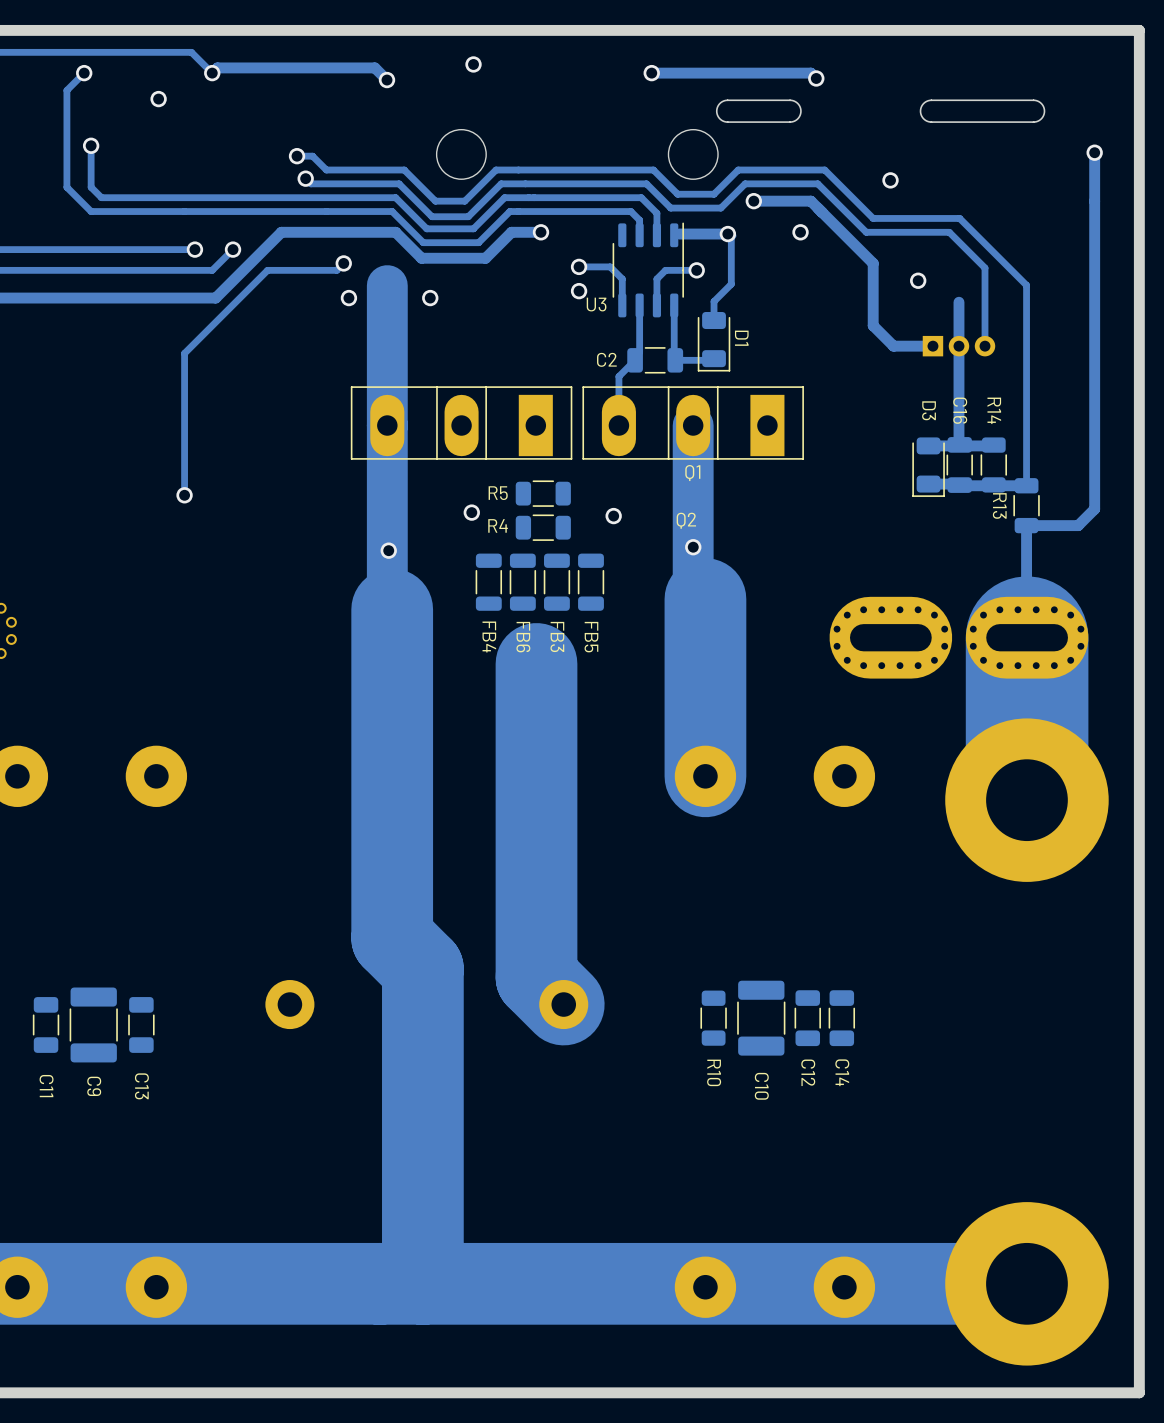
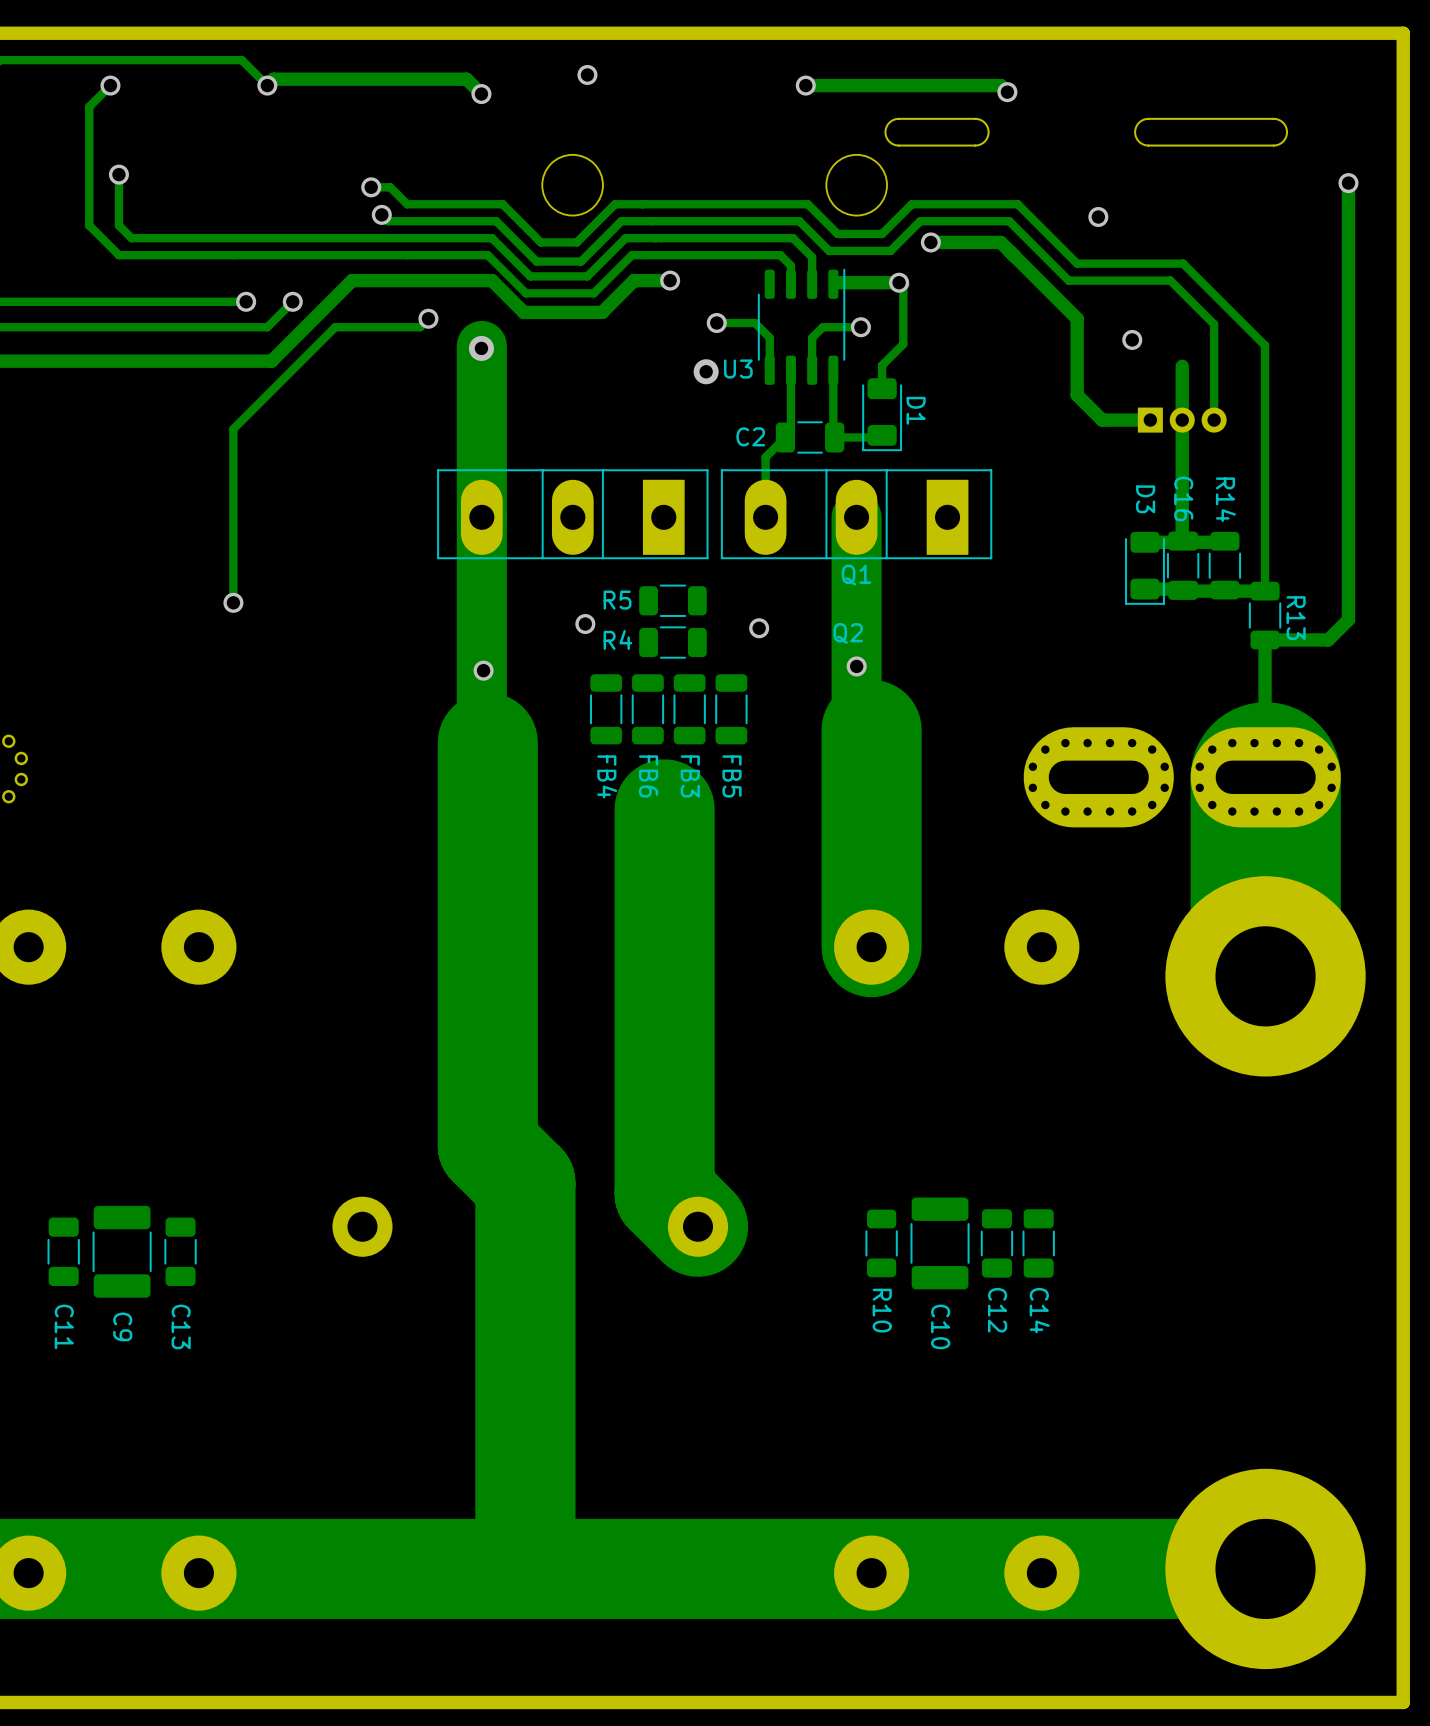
via: (158, 99) -> none
via: (800, 232) -> none
via: none -> (481, 348)
via: (579, 291) -> none
via: (348, 298) -> none
via: (430, 298) -> none
via: none -> (706, 371)
R13 name position: R13 (999, 505) -> R13 (1296, 618)

